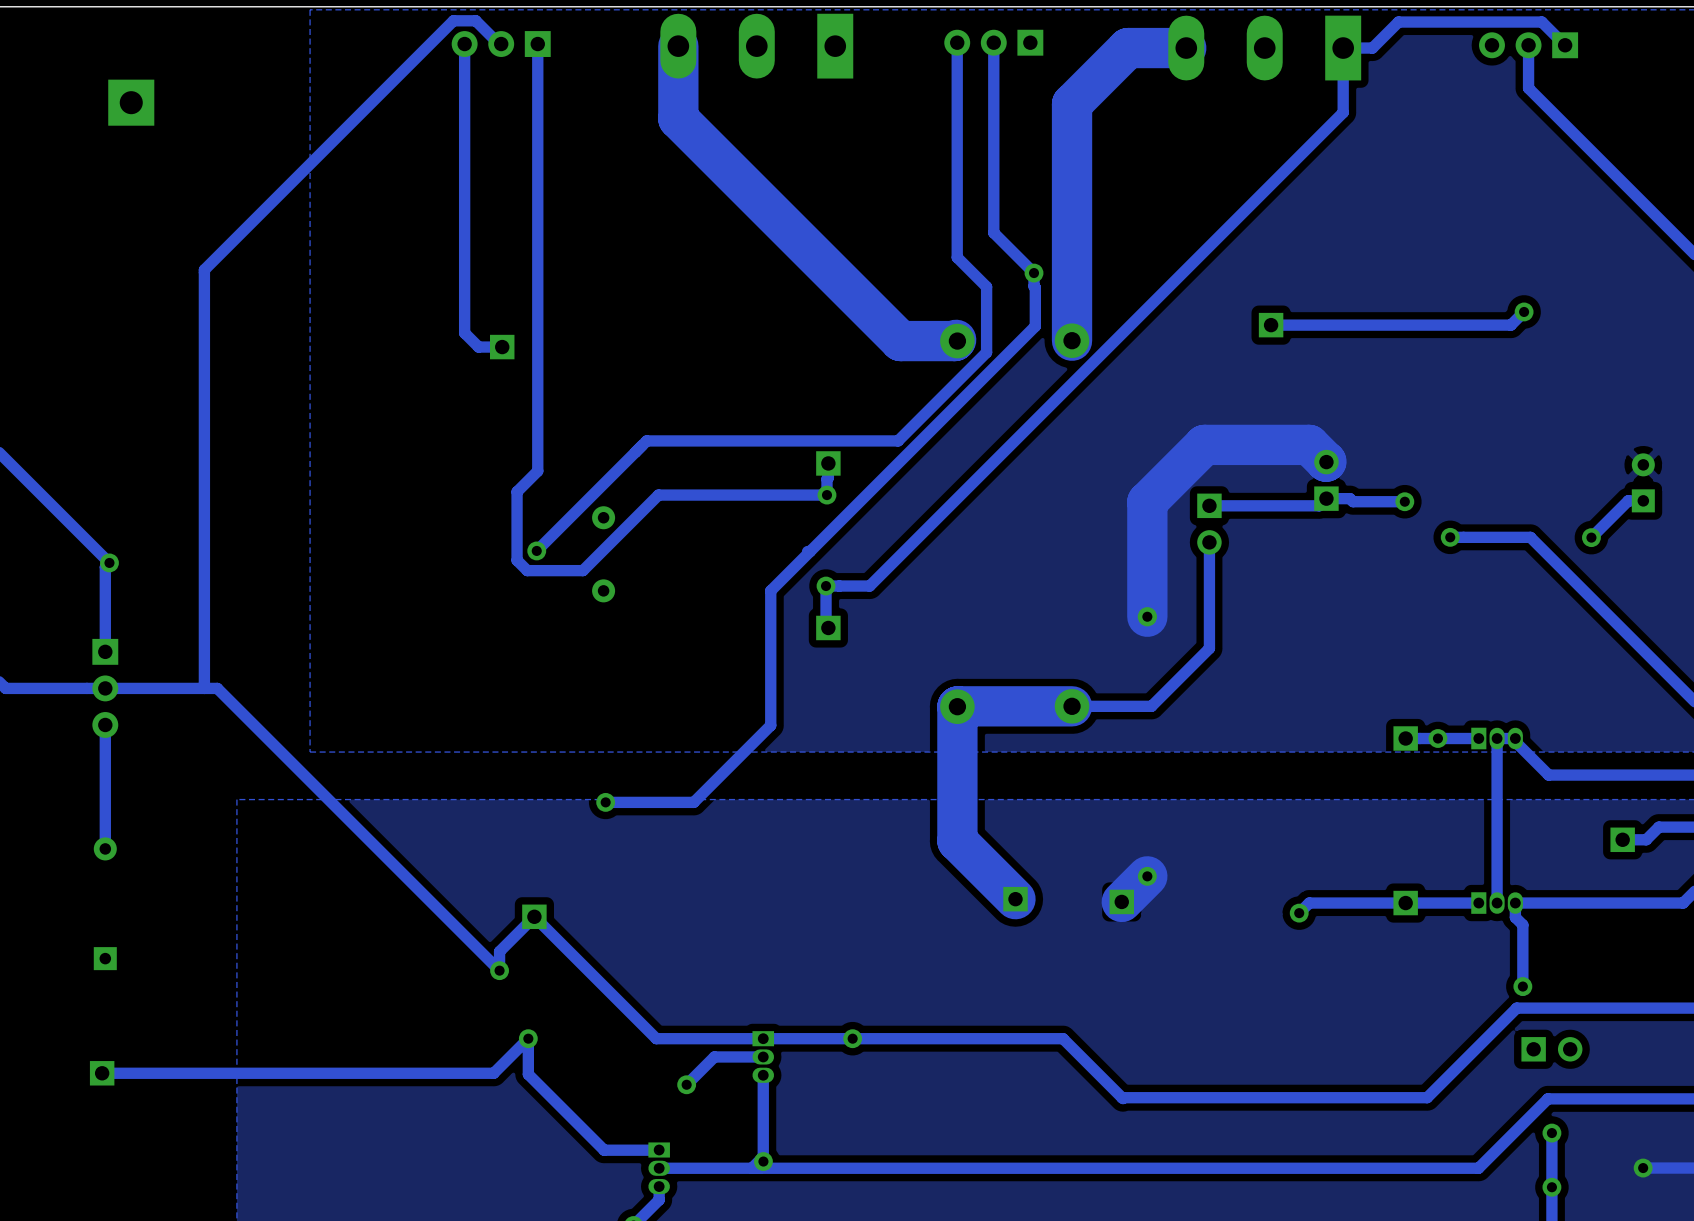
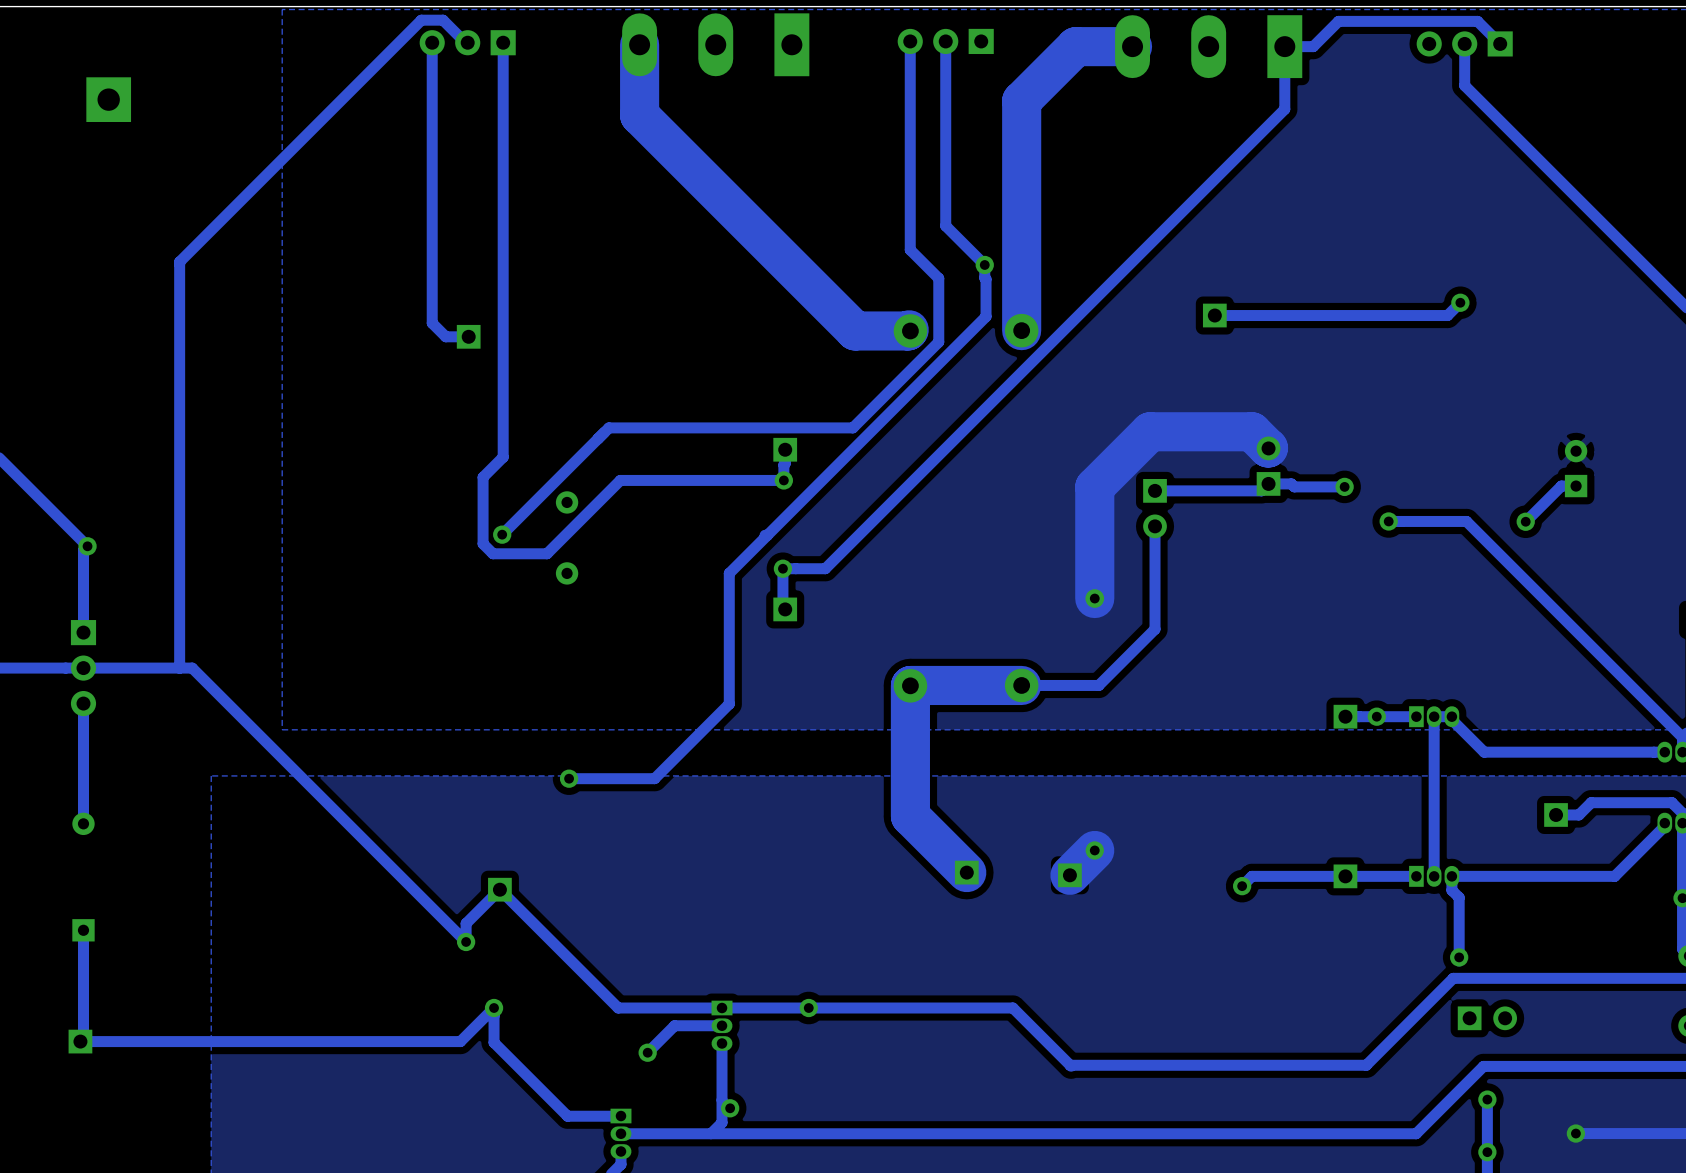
track: none -> (83, 930) (83, 1038)
via position: (763, 1161) -> (730, 1108)

